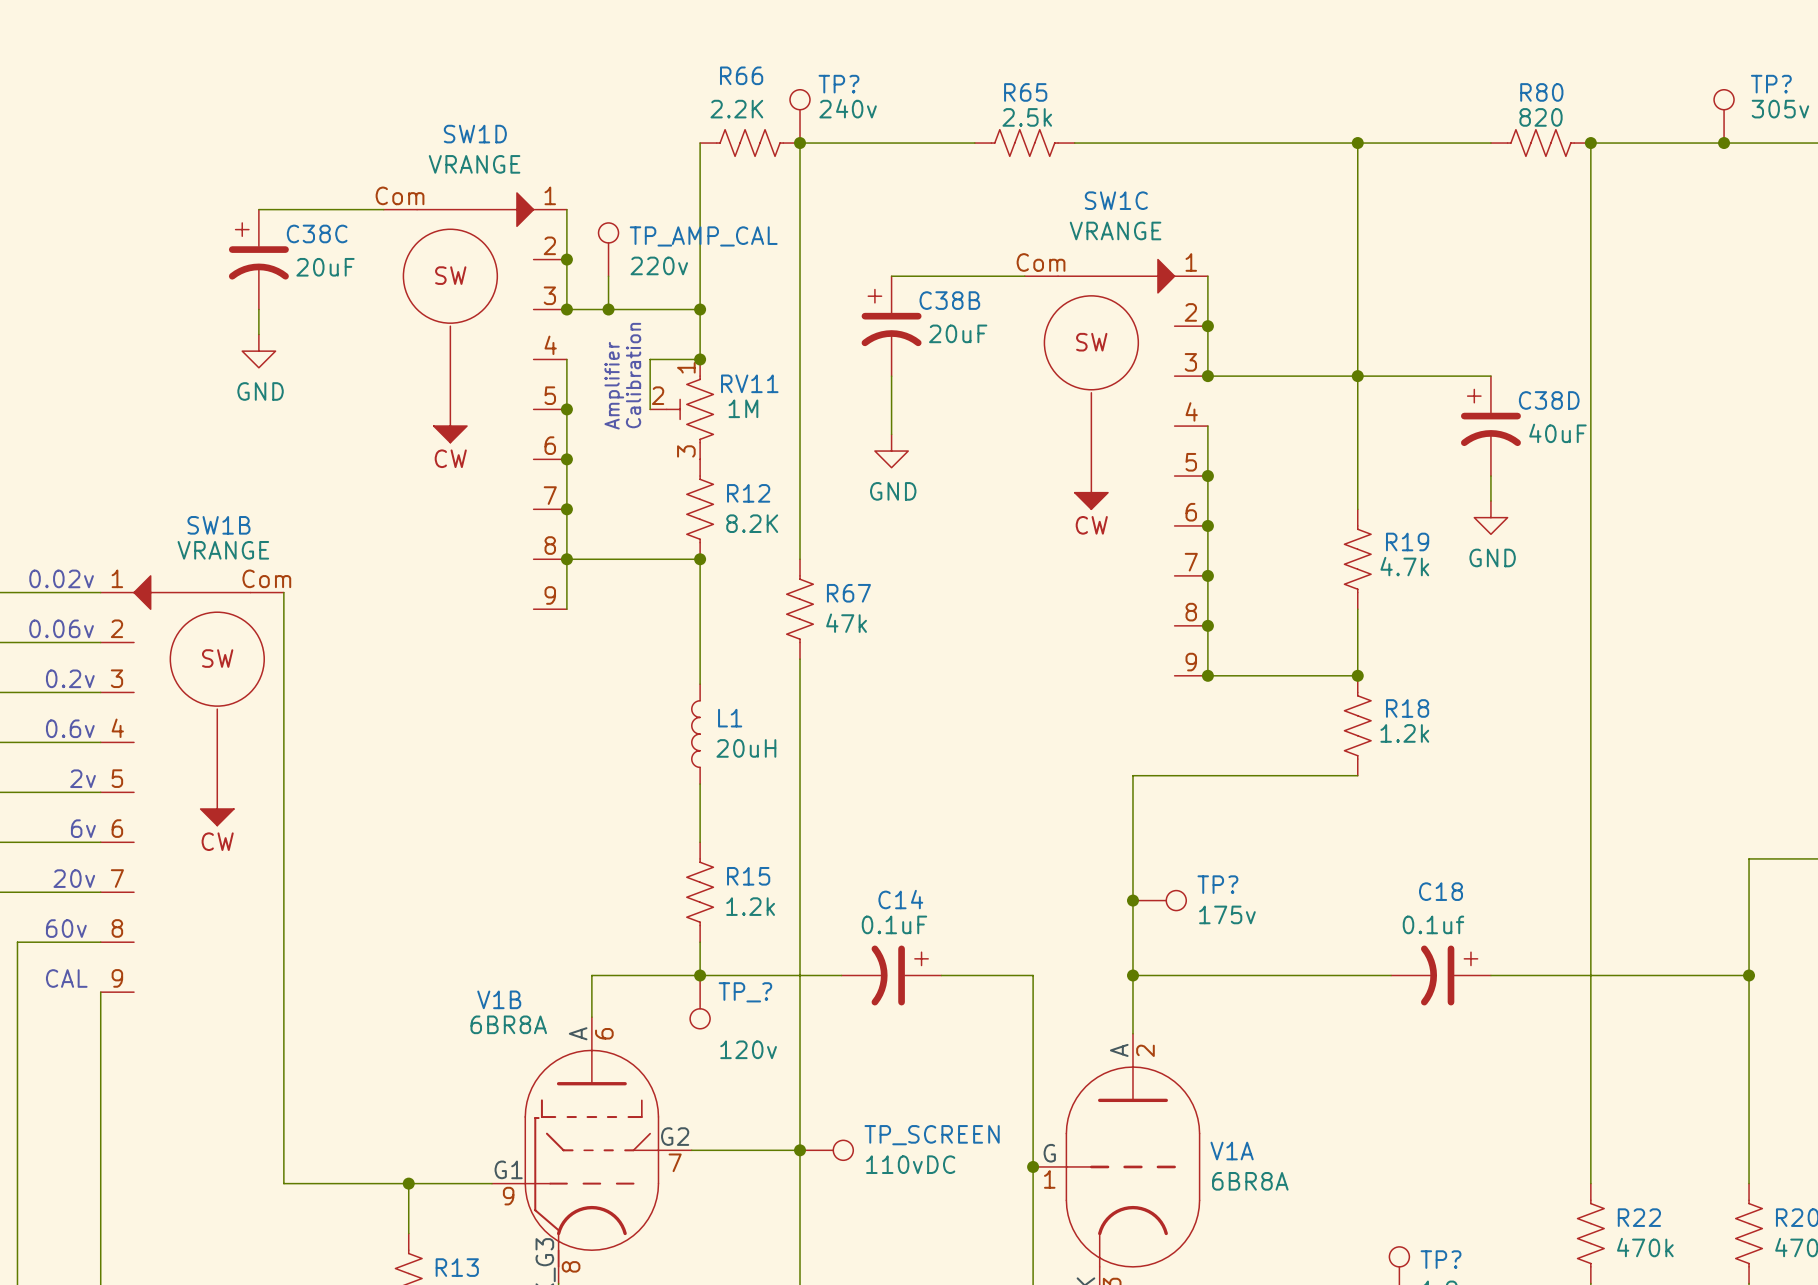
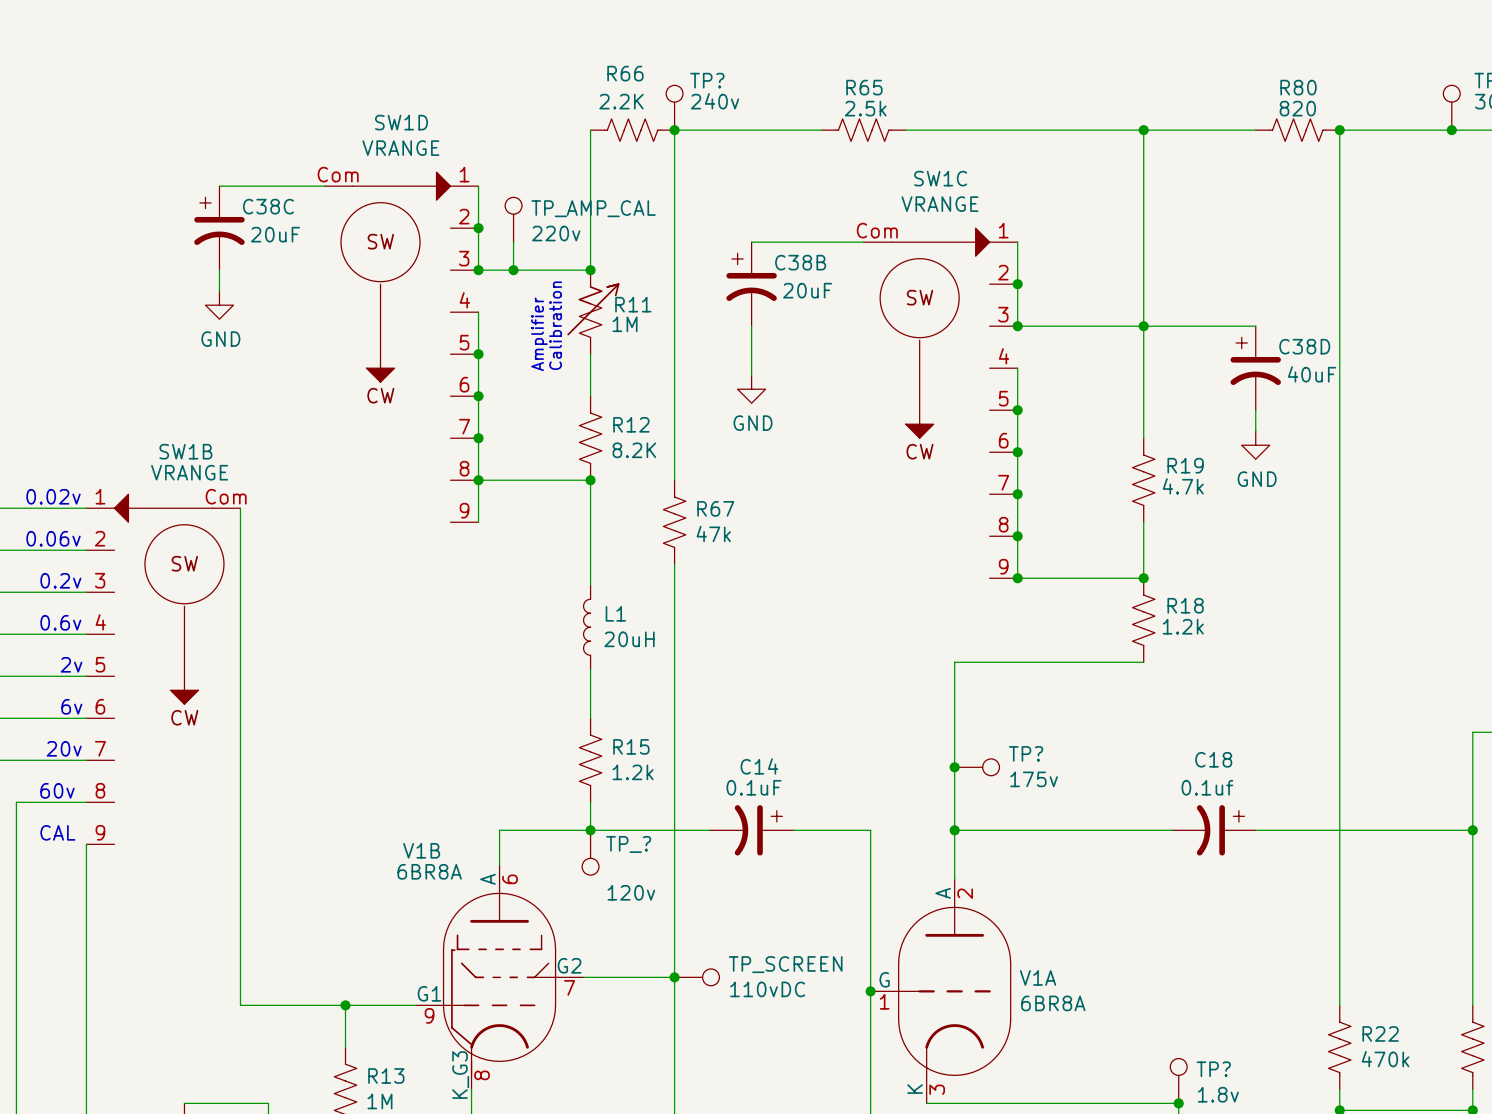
wire: (700, 309) (700, 359) (650, 359) (650, 409) -> none
junction: (700, 359) -> none
R11: none -> 1M (593, 312)
text: Calibration (633, 375) -> Amplifier (539, 334)
text: none -> Calibration (555, 325)
text: Amplifier (614, 385) -> none
RV11: 1M (681, 409) -> none
wire: none -> (590, 354) (590, 396)

